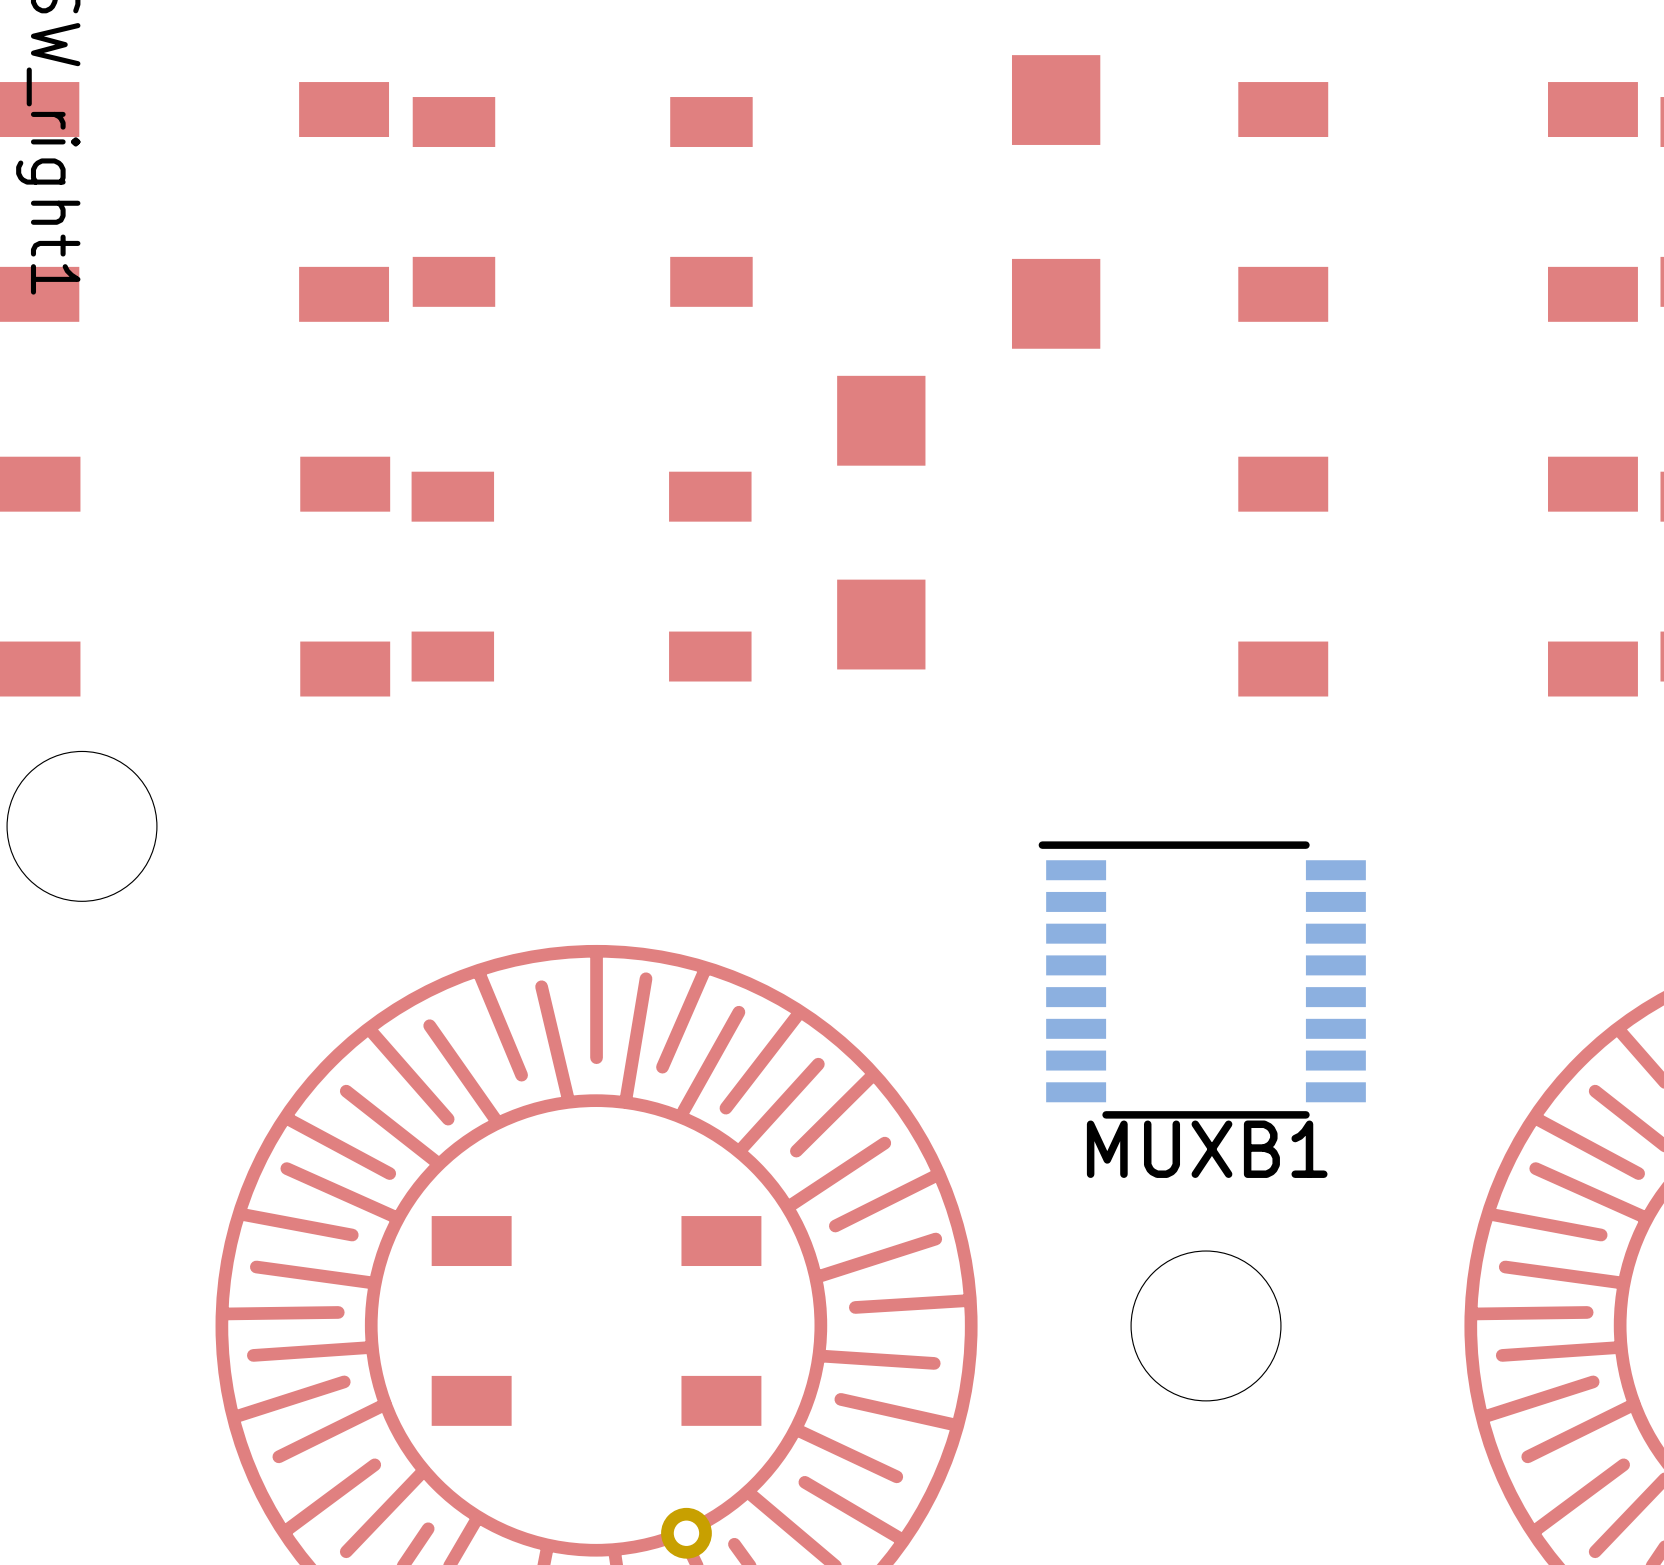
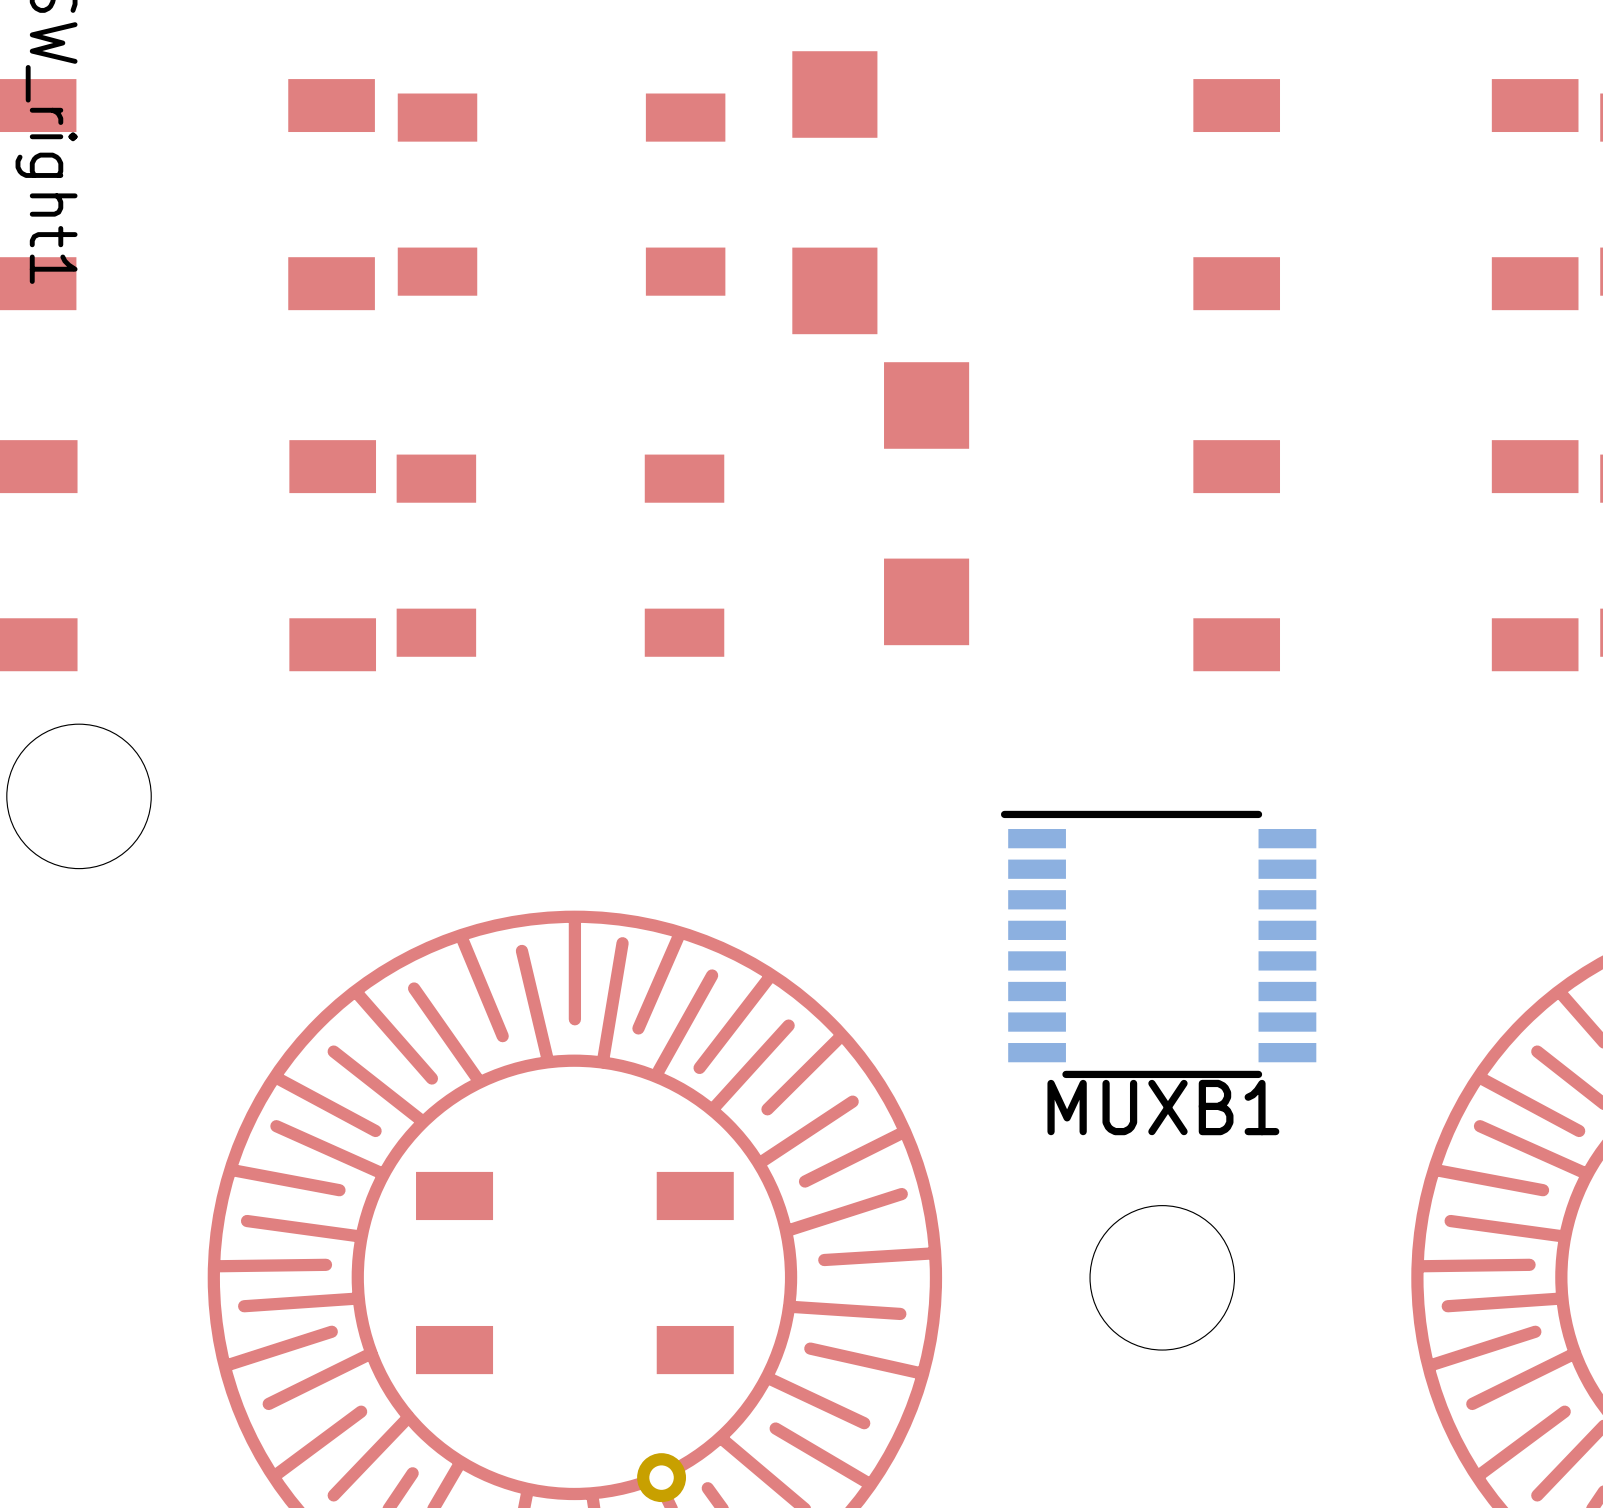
part: none -> (834, 192)
part: (1056, 201) -> none
part position: (881, 522) -> (926, 503)

